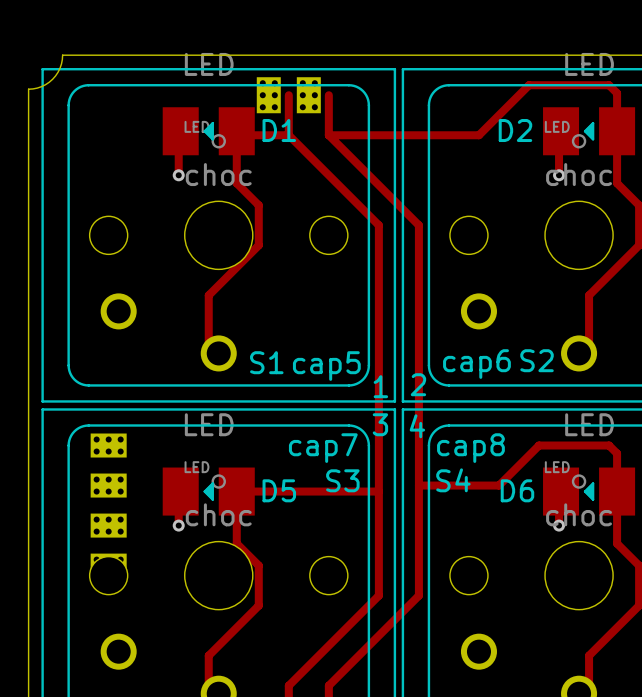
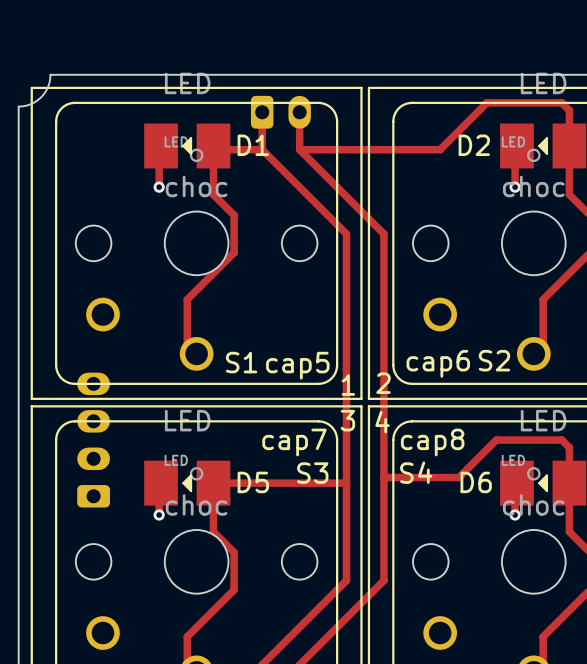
part: (288, 95) -> none
part: none -> (280, 112)
part: none -> (93, 440)
part: (108, 505) -> none

